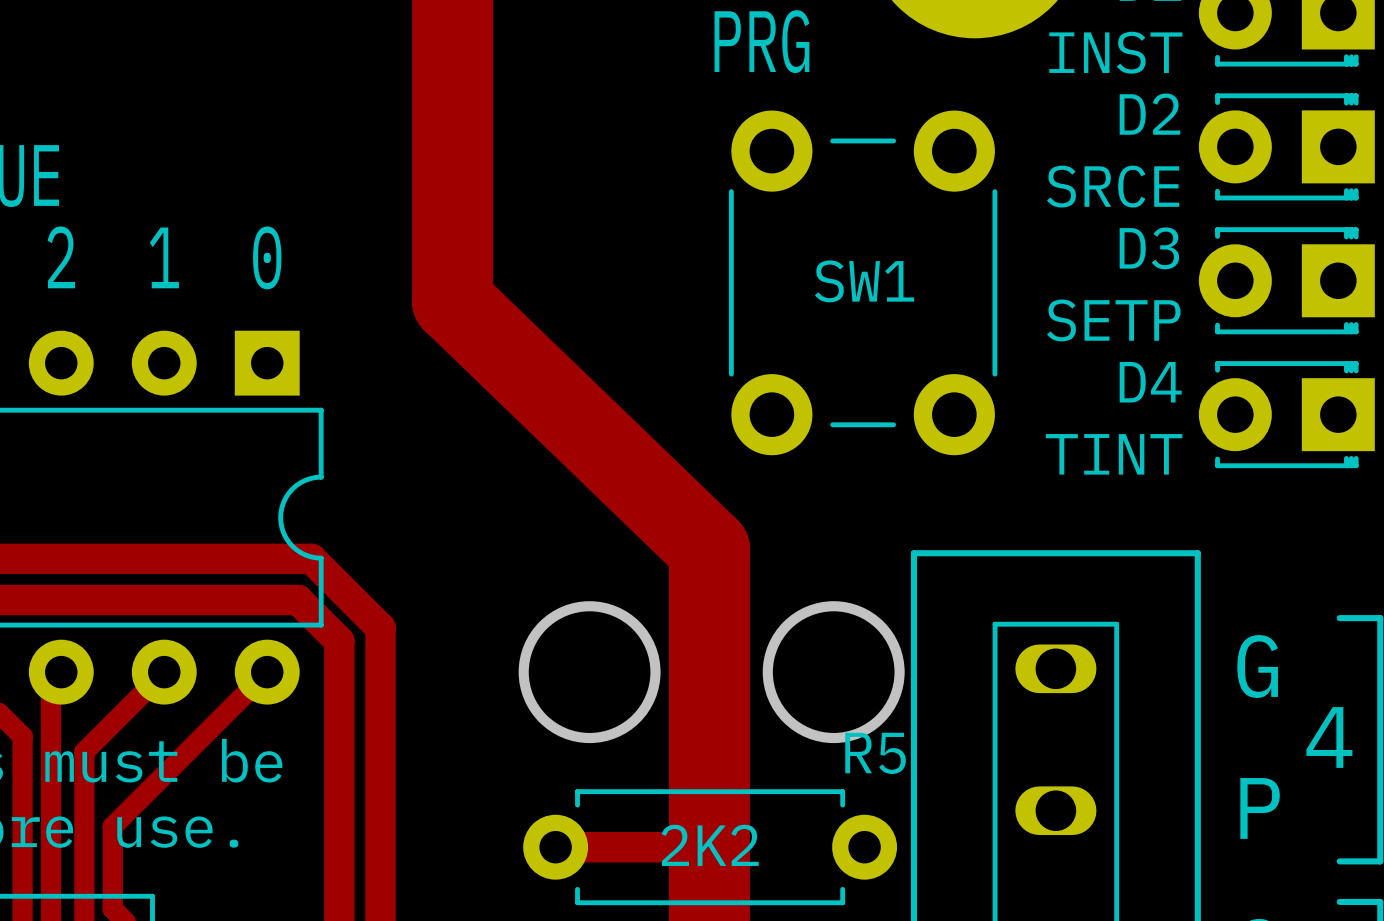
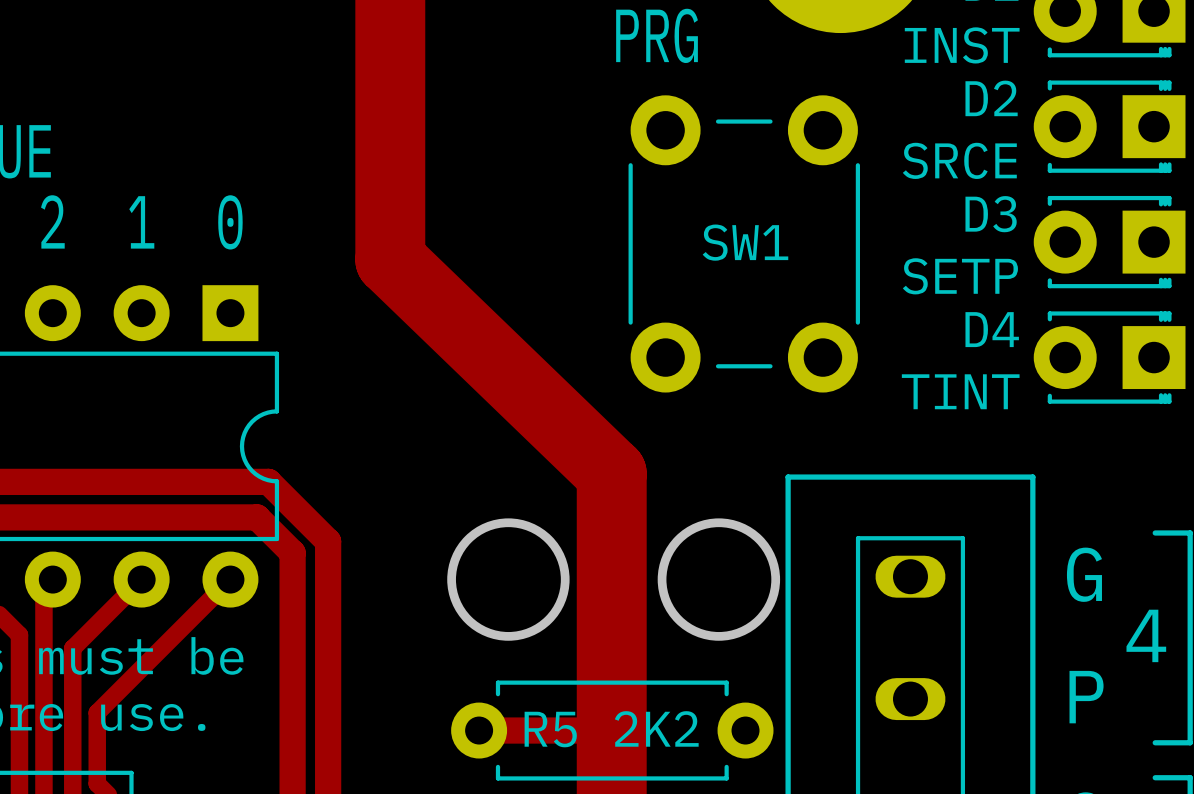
R5 name position: R5 (875, 753) -> R5 (550, 729)
R5 value position: 2K2 (710, 845) -> 2K2 (656, 728)

